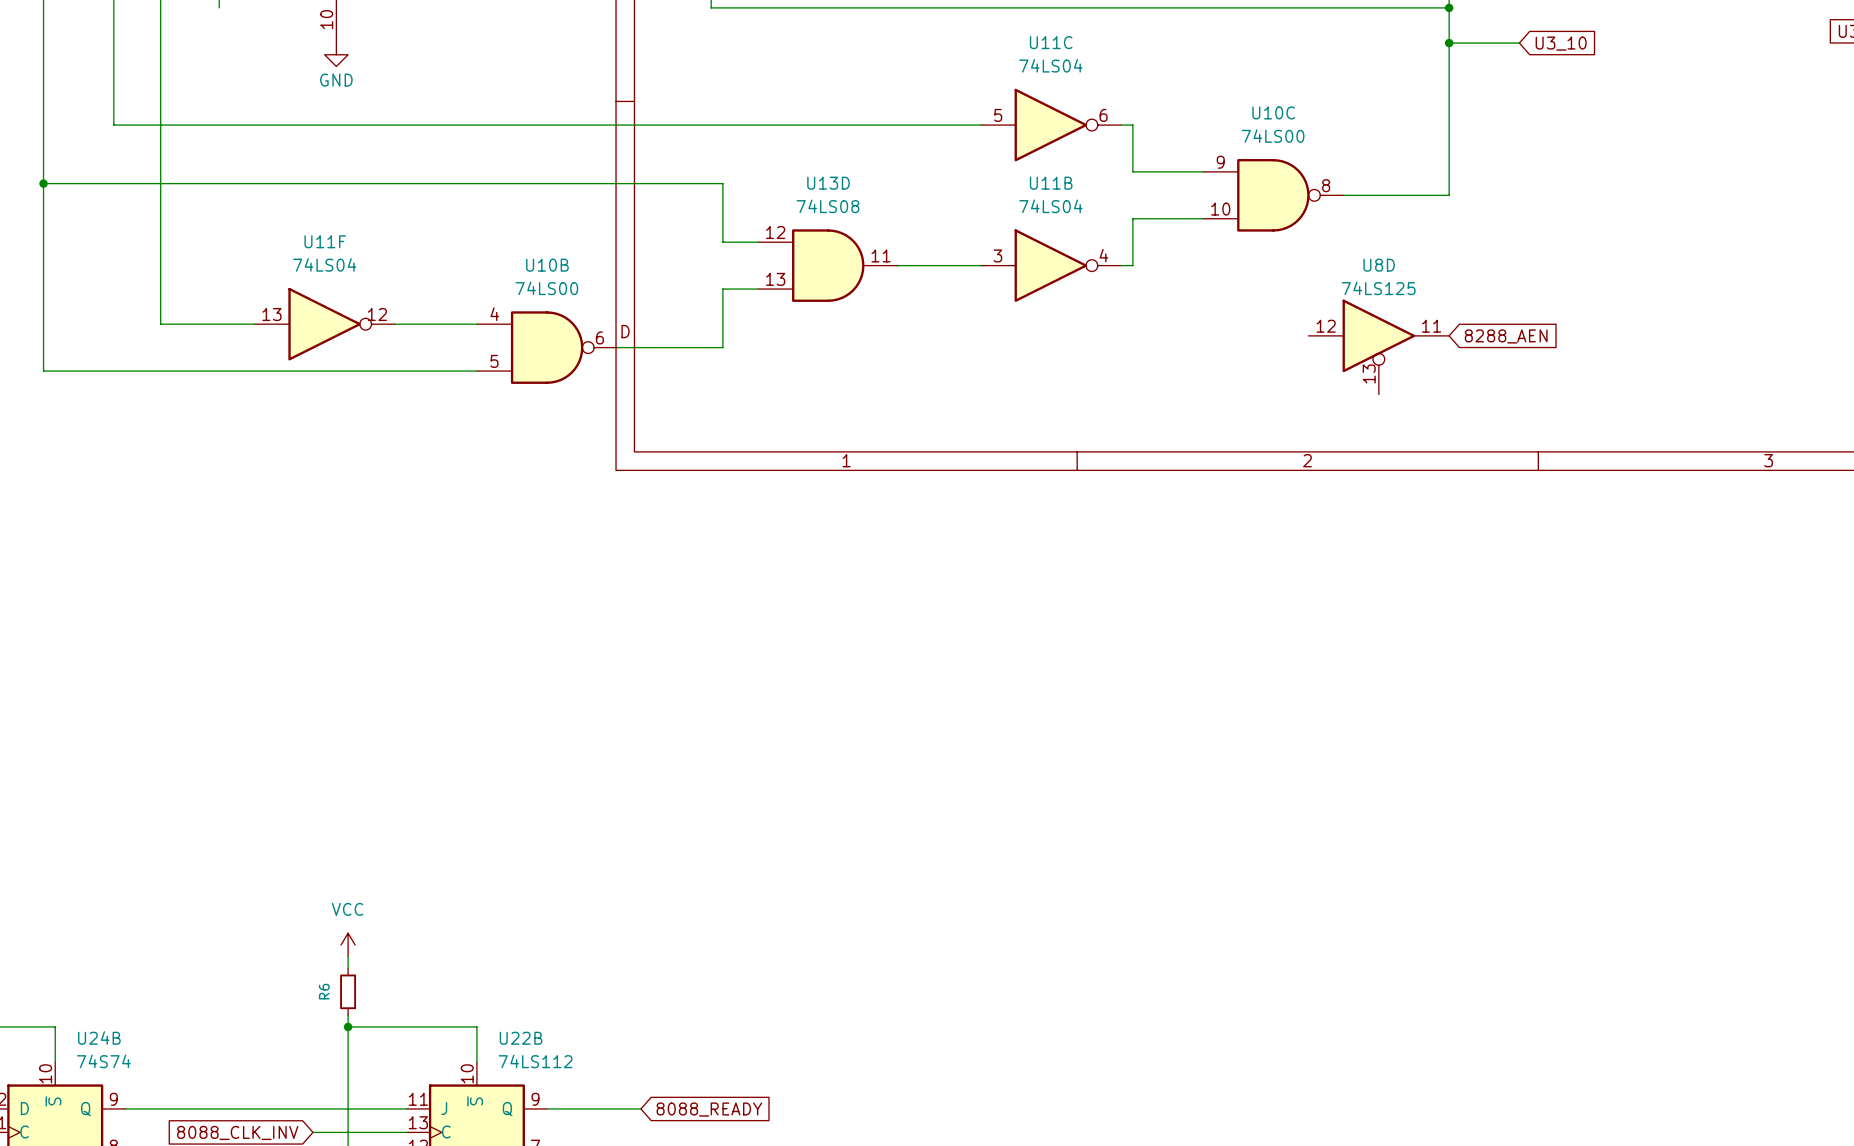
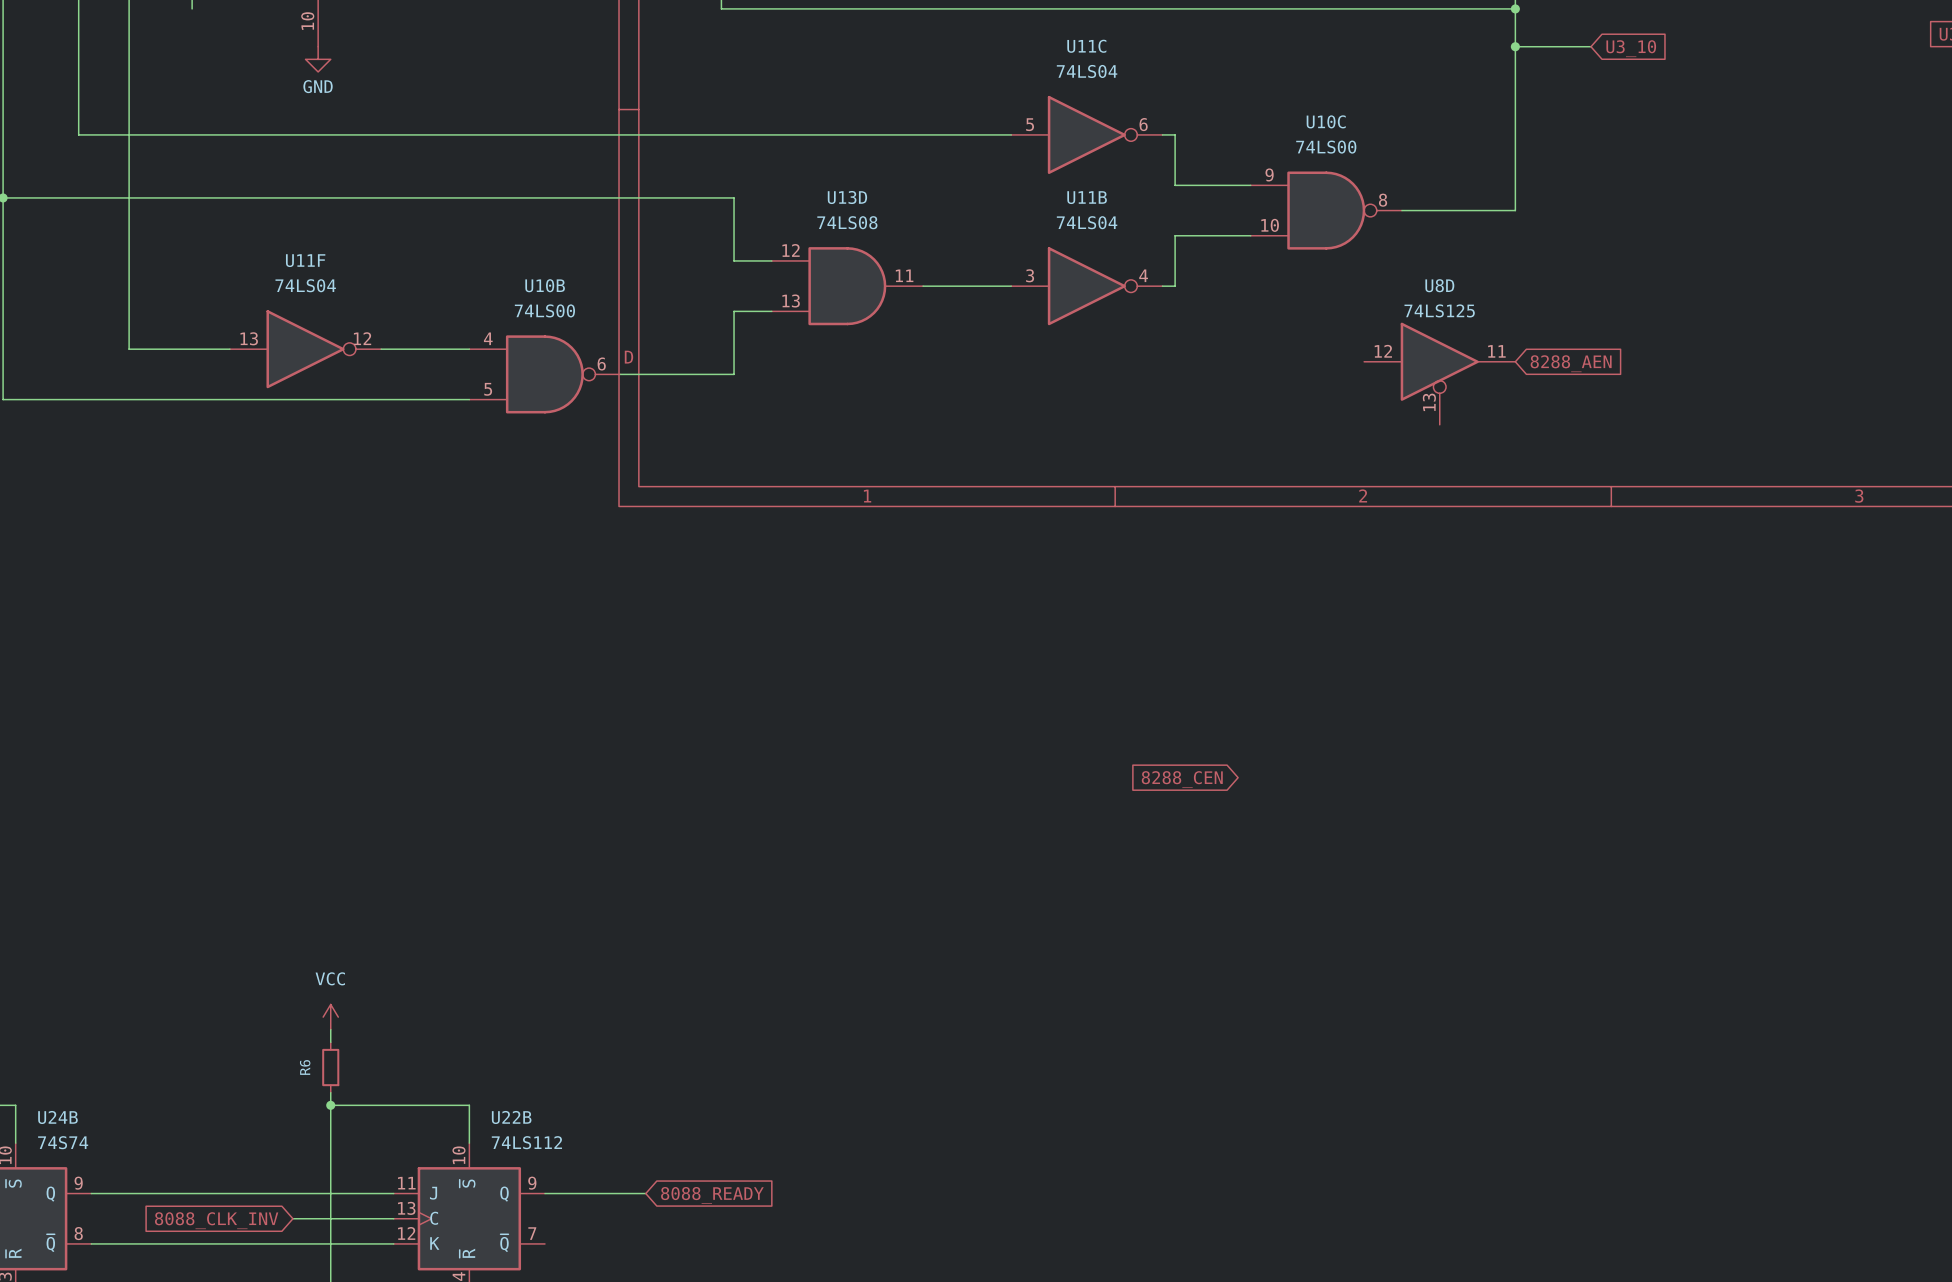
global label: none -> 8288_CEN (1182, 779)

